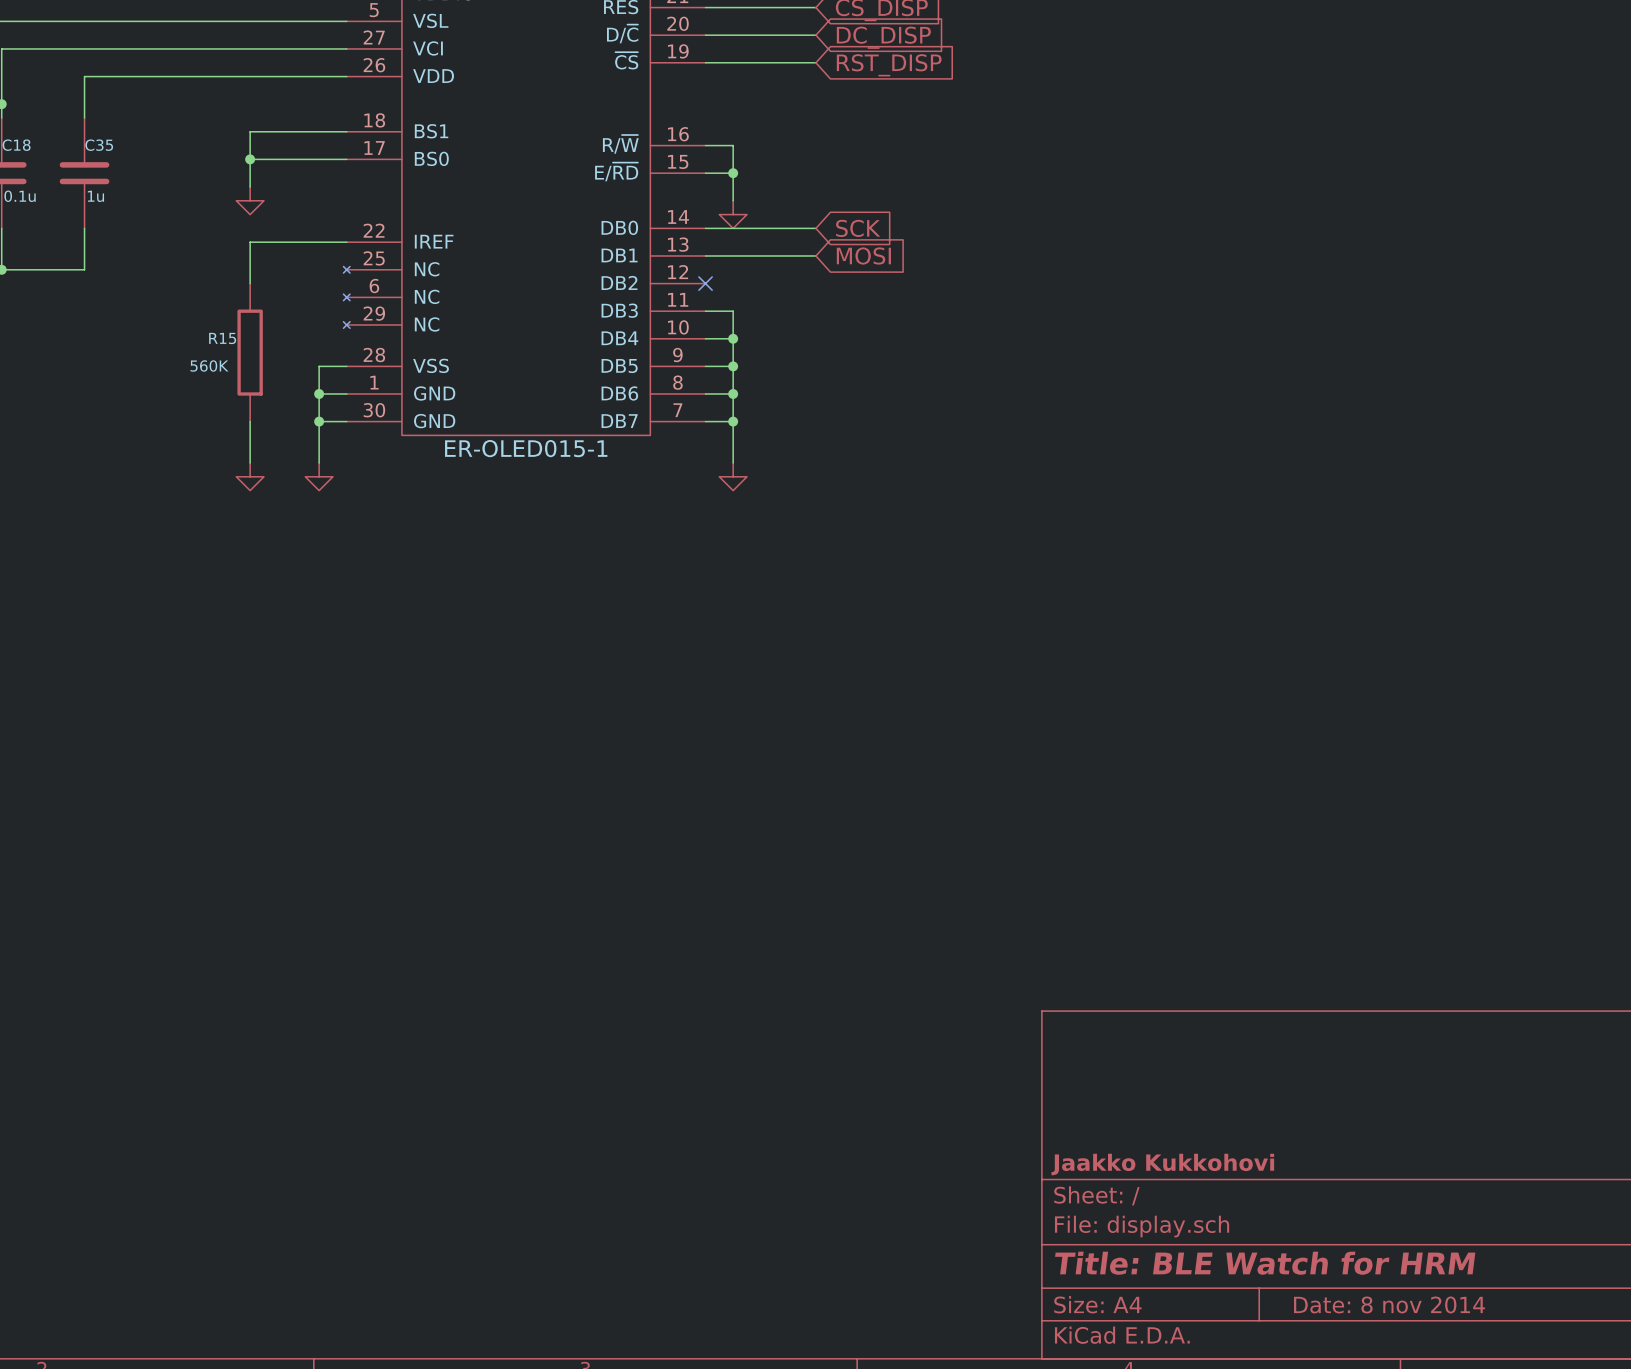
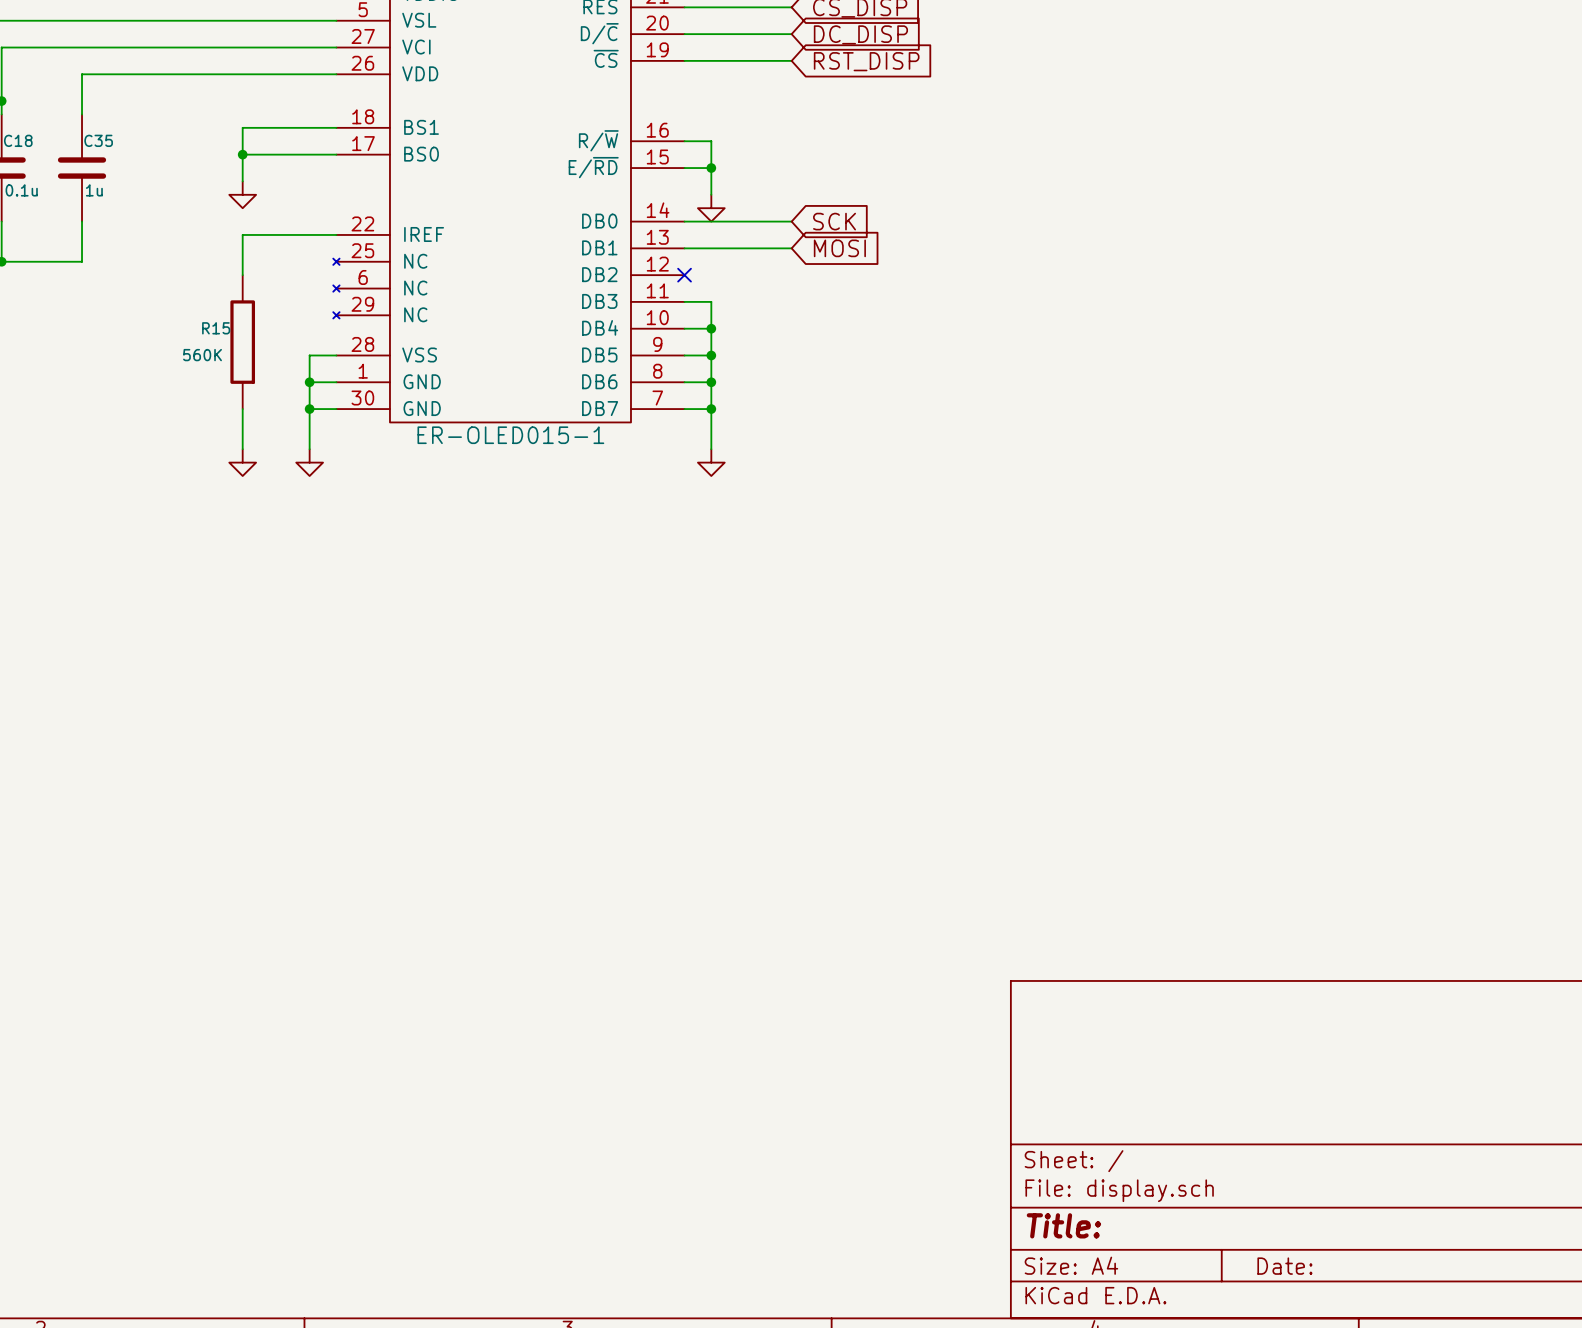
title block: Jaakko Kukkohovi (1162, 1164) -> none
title block: Title: BLE Watch for HRM (1265, 1263) -> Title: (1063, 1225)
title block: Date: 8 nov 2014 (1389, 1304) -> Date: (1284, 1266)

